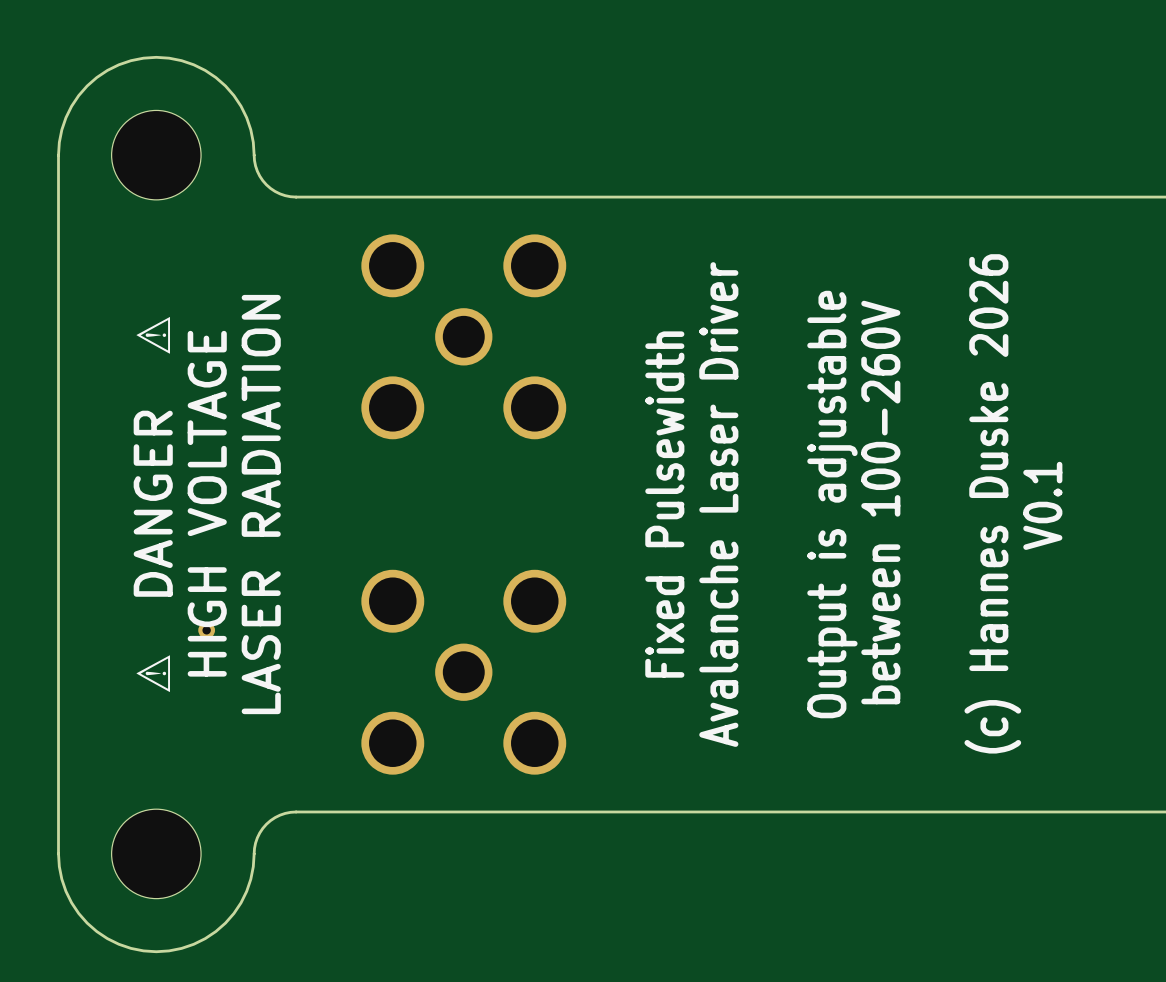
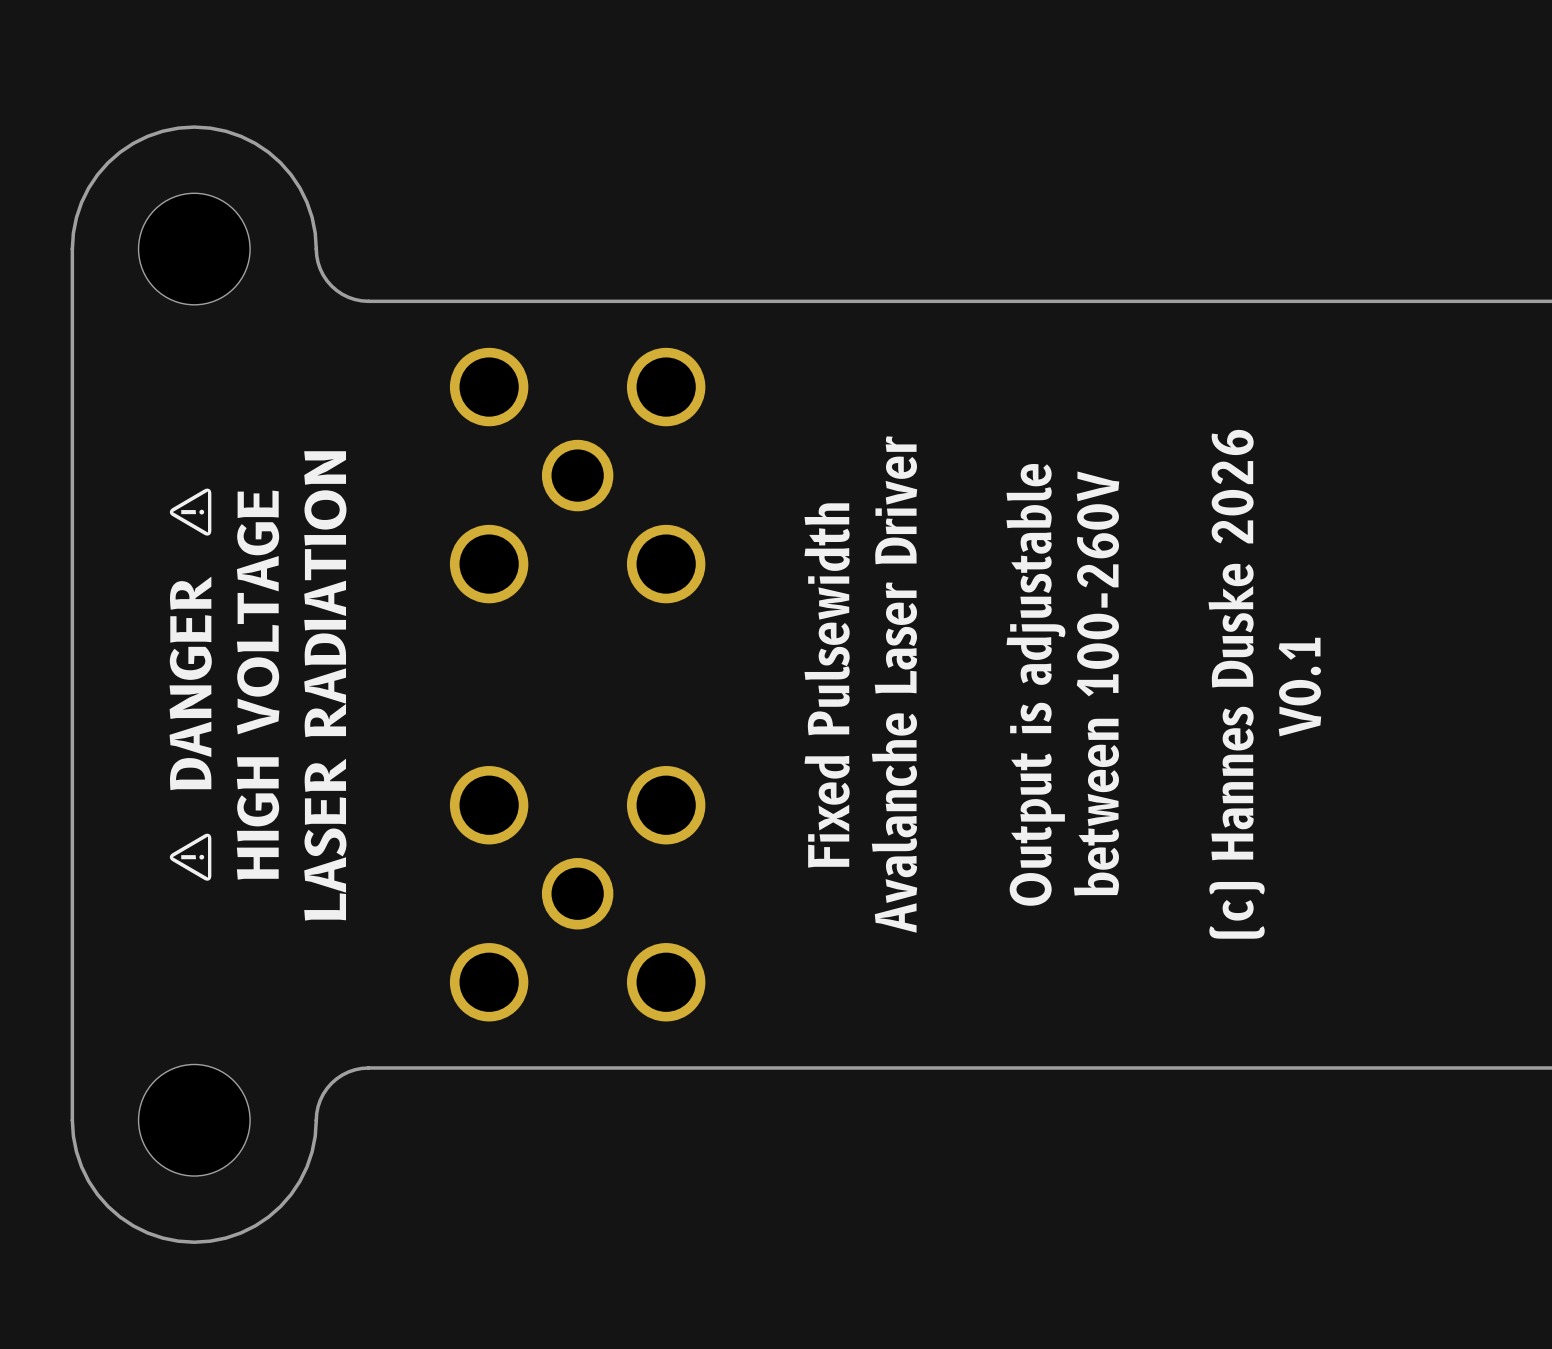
part: (206, 630) -> none

